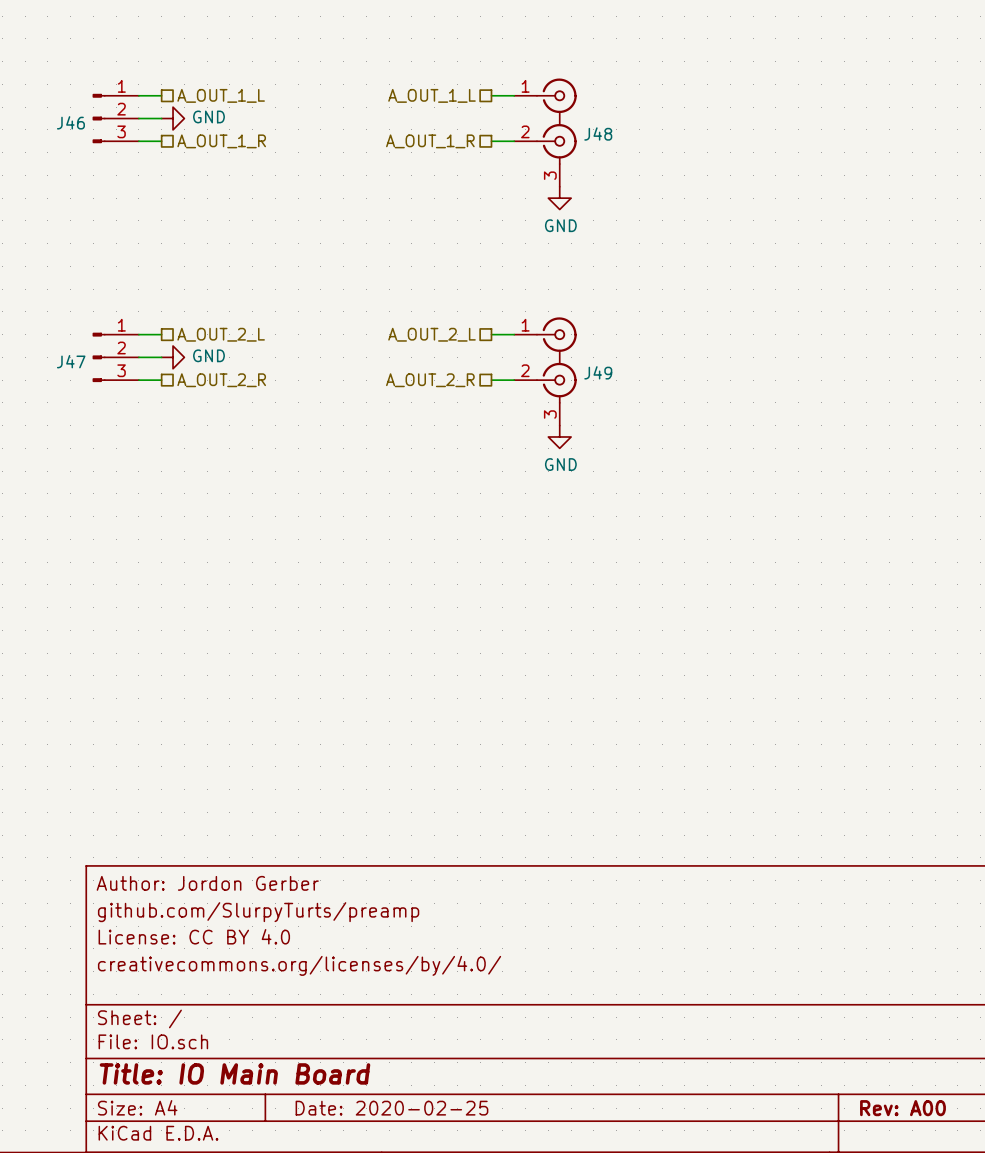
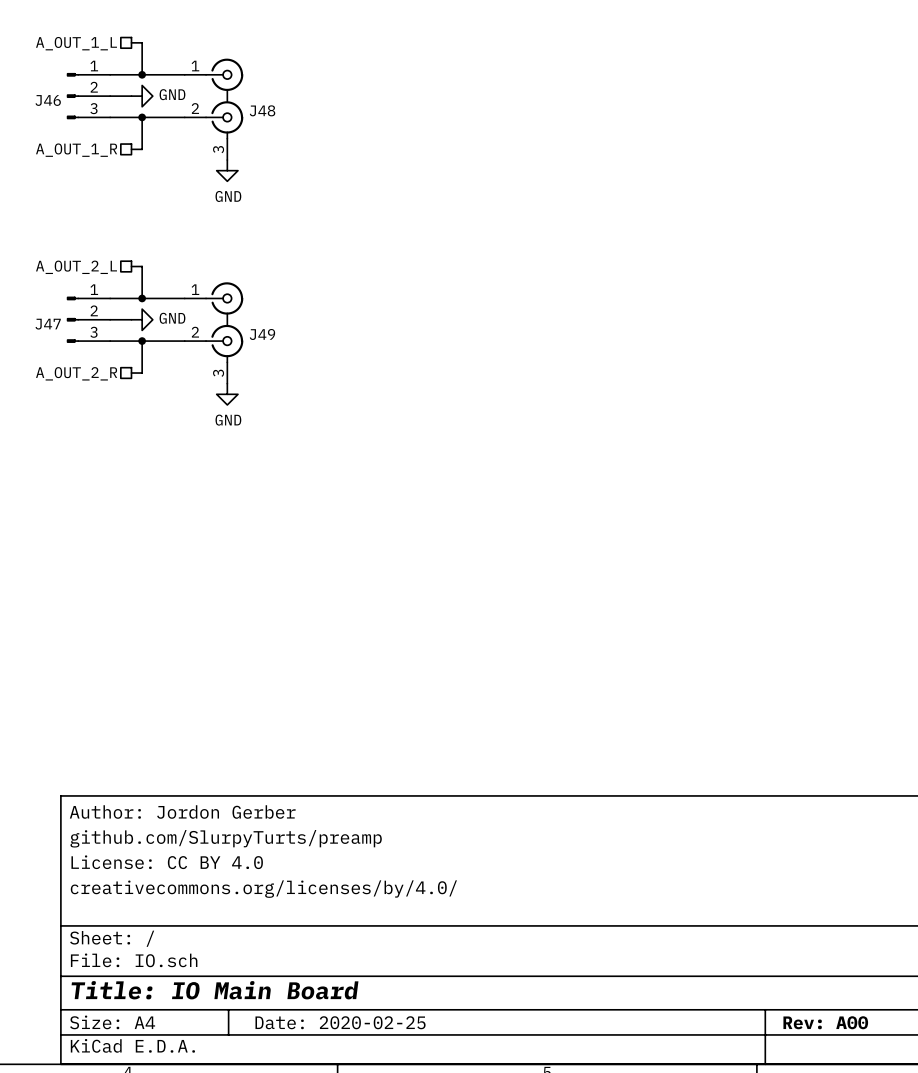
wire: none -> (131, 42) (142, 42) (142, 74)
wire: none -> (131, 74) (184, 74)
junction: none -> (142, 74)
hierarchical label rotation: 0° (221, 95) -> 180° (76, 43)
hierarchical label position: A_OUT_1_L (221, 95) -> A_OUT_1_L (76, 43)
hierarchical label: A_OUT_1_L (432, 95) -> none
wire: (491, 95) (514, 95) -> none
J48 position: (545, 132) -> (214, 109)
wire: none -> (131, 117) (184, 117)
wire: none -> (142, 117) (142, 149) (131, 149)
junction: none -> (142, 117)
hierarchical label rotation: 0° (221, 141) -> 180° (76, 150)
hierarchical label position: A_OUT_1_R (221, 141) -> A_OUT_1_R (76, 150)
hierarchical label: A_OUT_1_R (430, 141) -> none
wire: (491, 141) (514, 141) -> none
power symbol: none -> GND (227, 170)
power symbol: GND (559, 198) -> none
wire: none -> (131, 266) (142, 266) (142, 298)
wire: none -> (131, 298) (184, 298)
junction: none -> (142, 298)
hierarchical label rotation: 0° (221, 334) -> 180° (76, 267)
hierarchical label position: A_OUT_2_L (221, 334) -> A_OUT_2_L (76, 267)
hierarchical label: A_OUT_2_L (432, 334) -> none
wire: (491, 334) (514, 334) -> none
J49 position: (545, 371) -> (214, 332)
wire: none -> (131, 341) (184, 341)
wire: none -> (142, 341) (142, 373) (131, 373)
junction: none -> (142, 341)
hierarchical label rotation: 0° (221, 380) -> 180° (76, 373)
hierarchical label position: A_OUT_2_R (221, 380) -> A_OUT_2_R (76, 373)
hierarchical label: A_OUT_2_R (430, 380) -> none
wire: (491, 380) (514, 380) -> none
power symbol: none -> GND (227, 394)
power symbol: GND (559, 436) -> none

